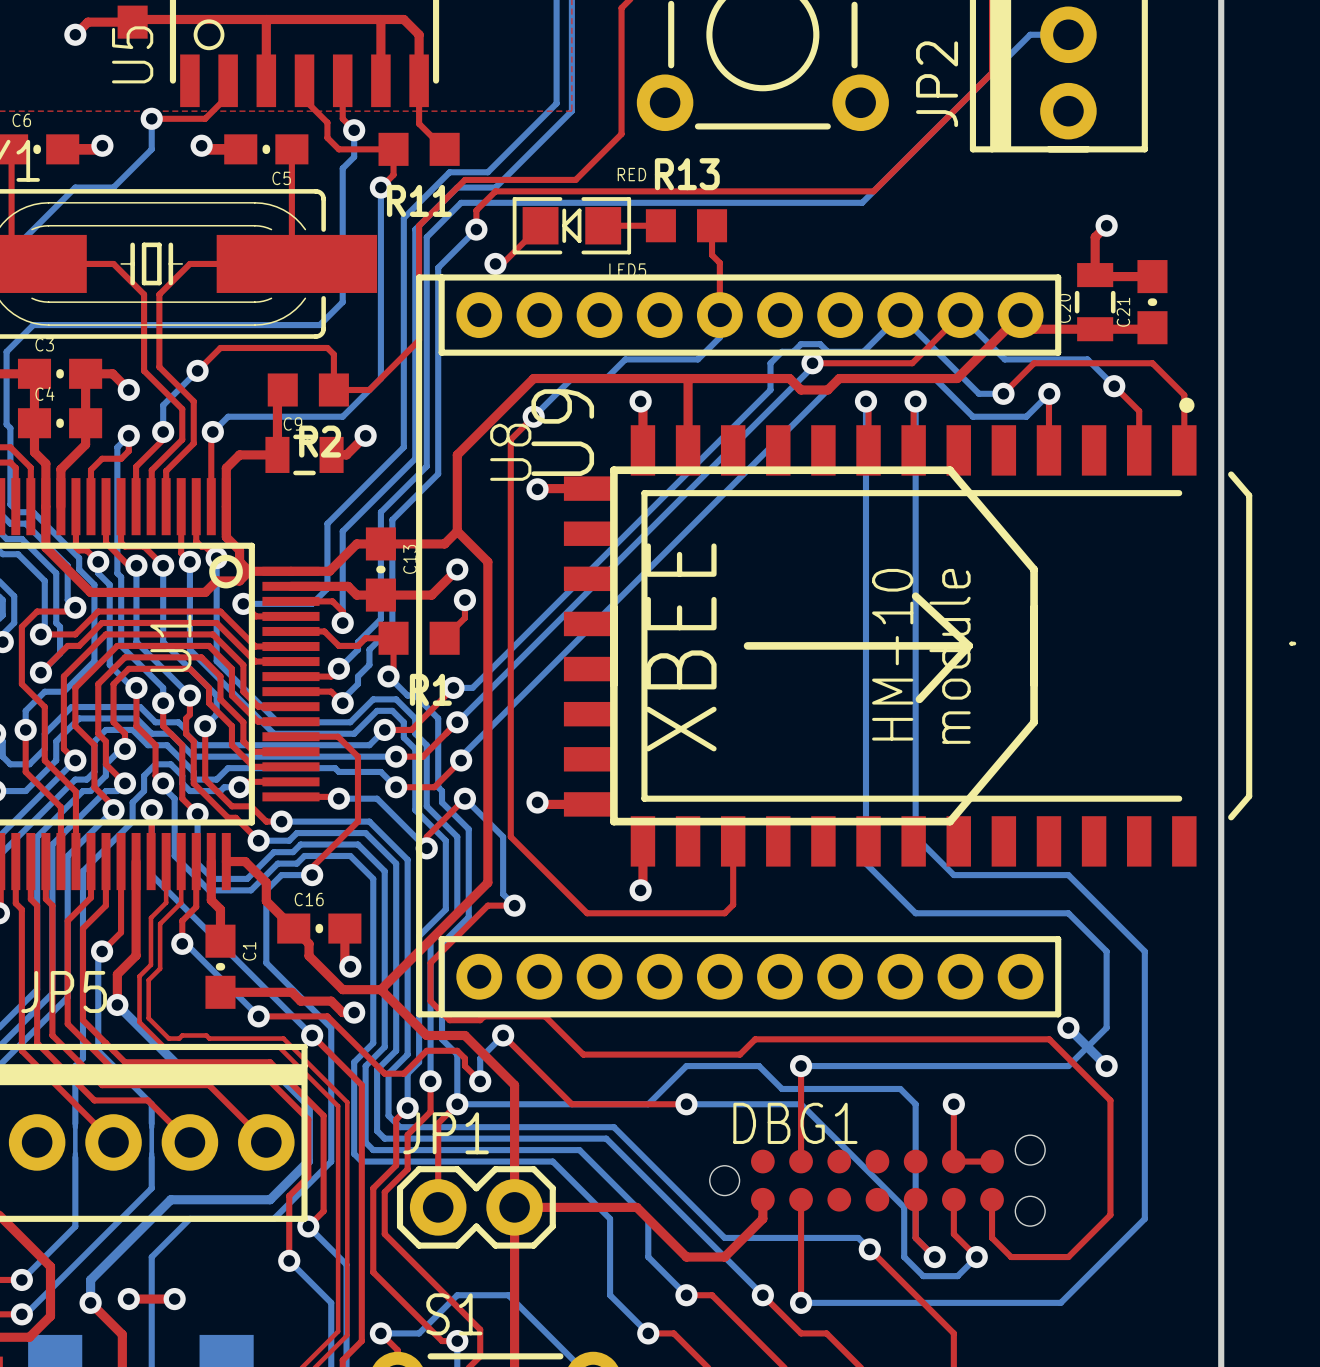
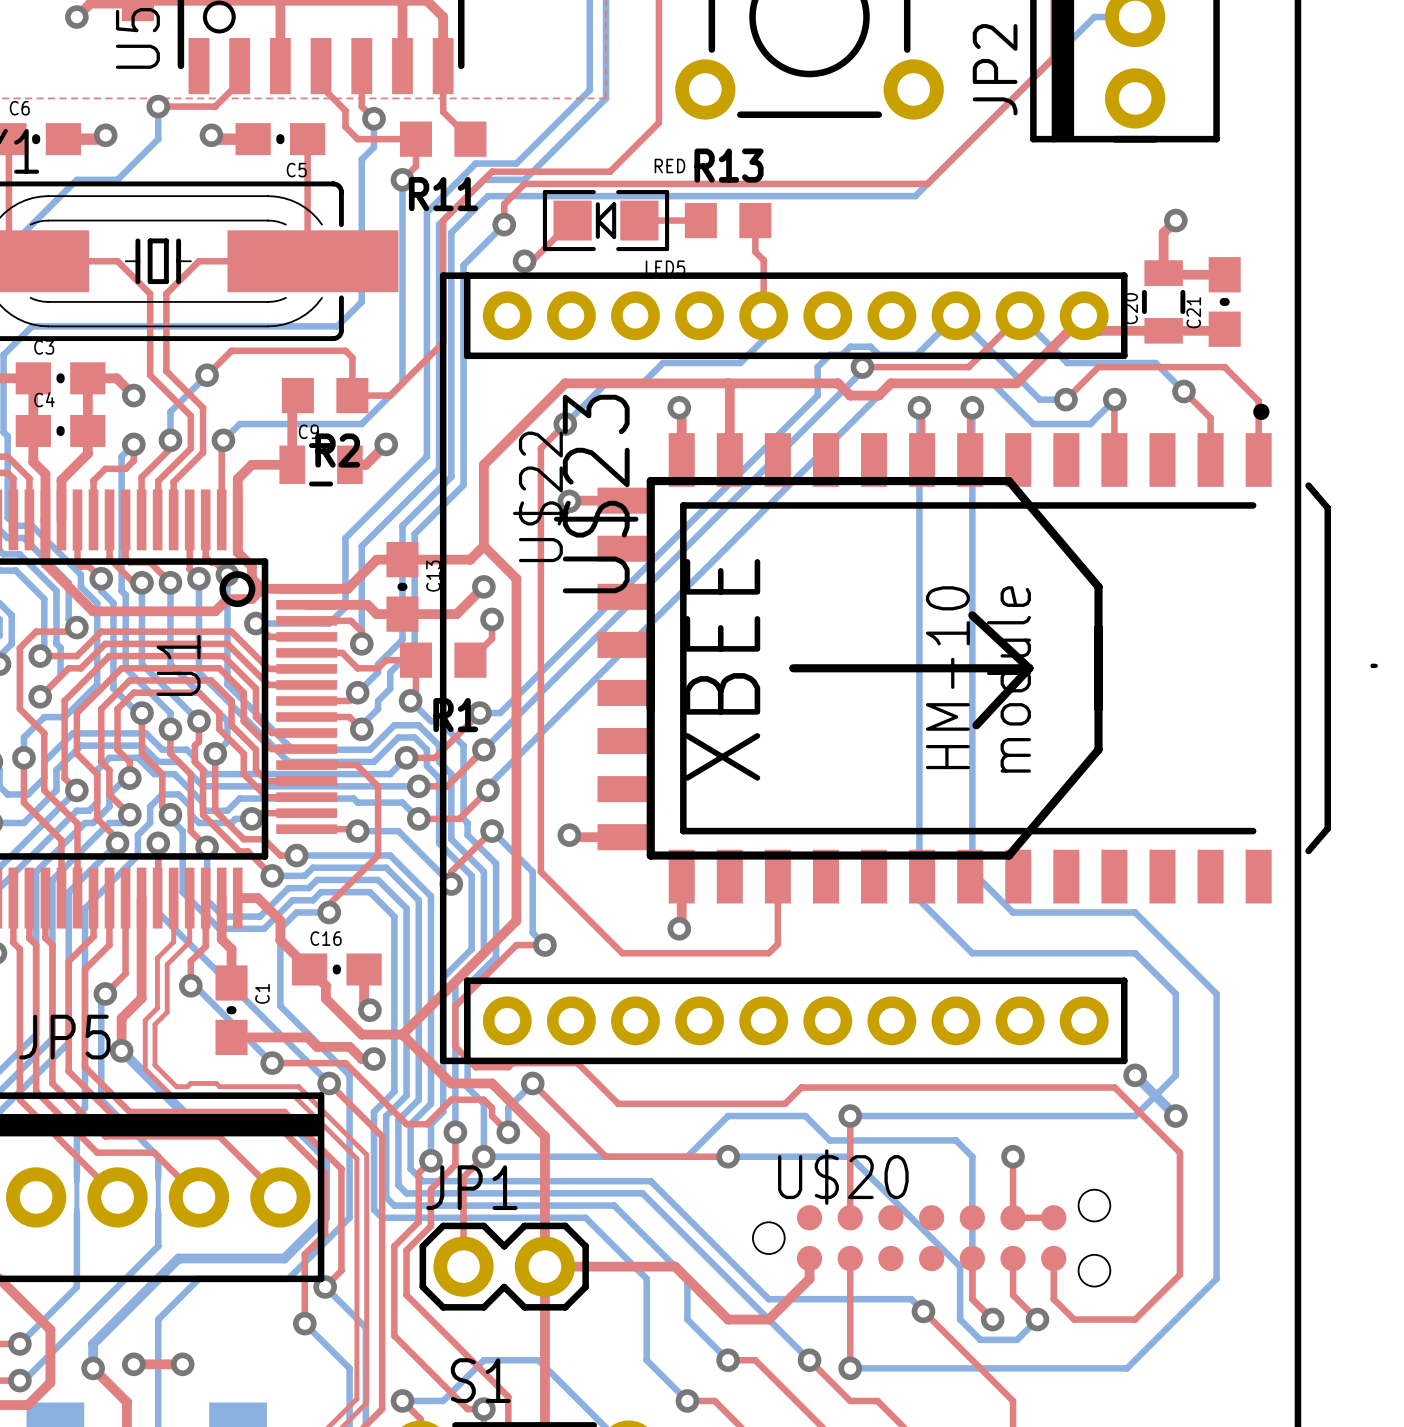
U9 name: U9 (562, 432) -> U$23 (596, 494)
U8 name: U8 (510, 452) -> U$22 (540, 496)
DBG1 name: DBG1 (795, 1123) -> U$20 (843, 1177)

